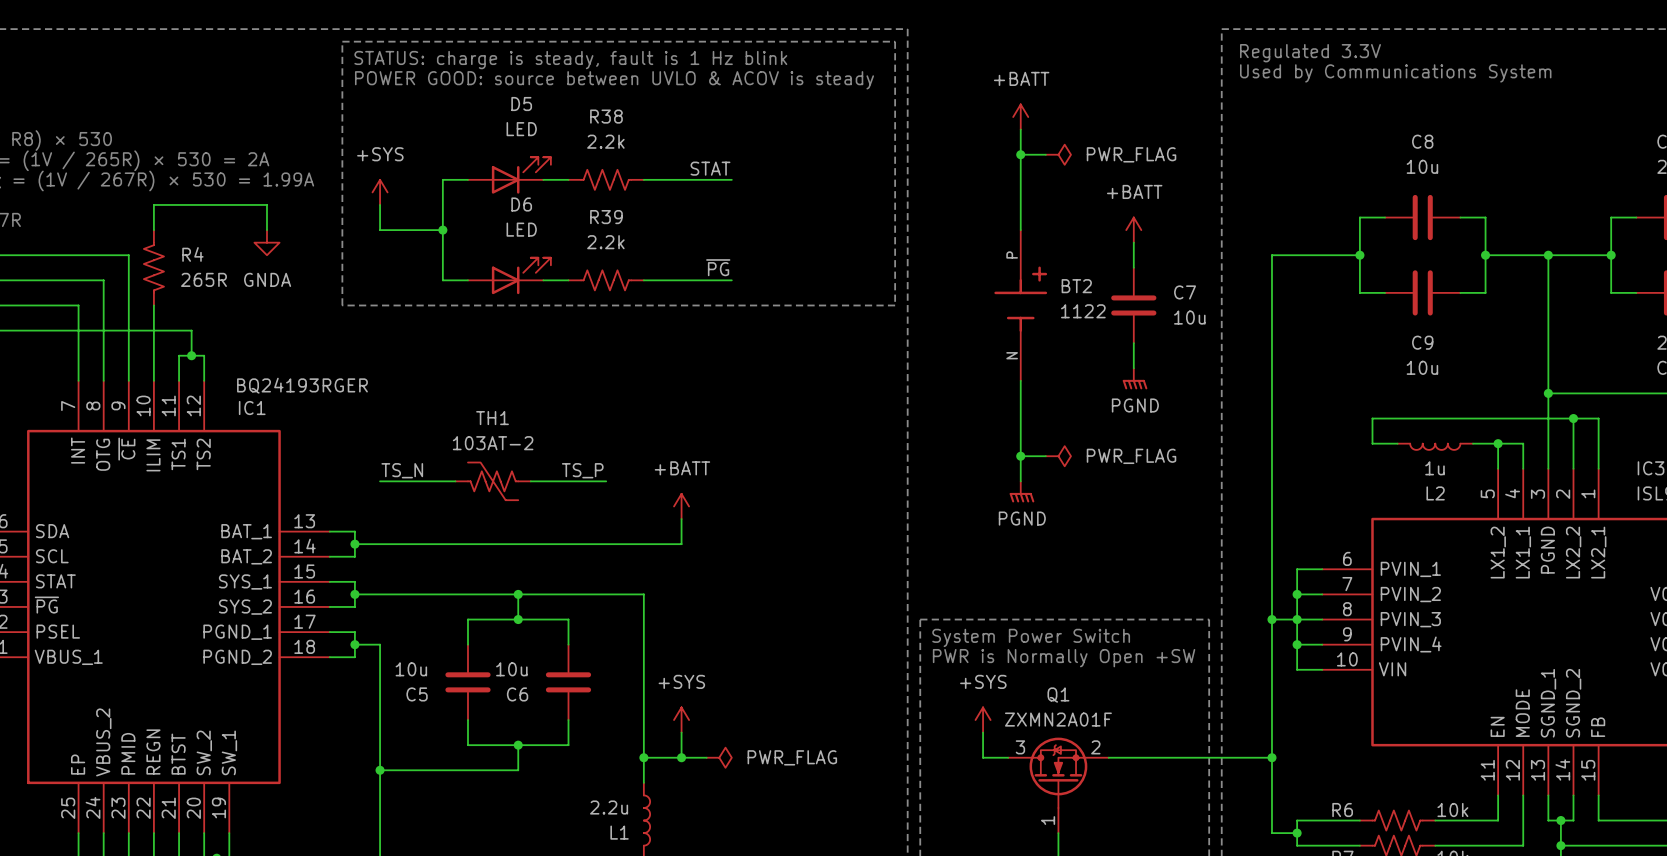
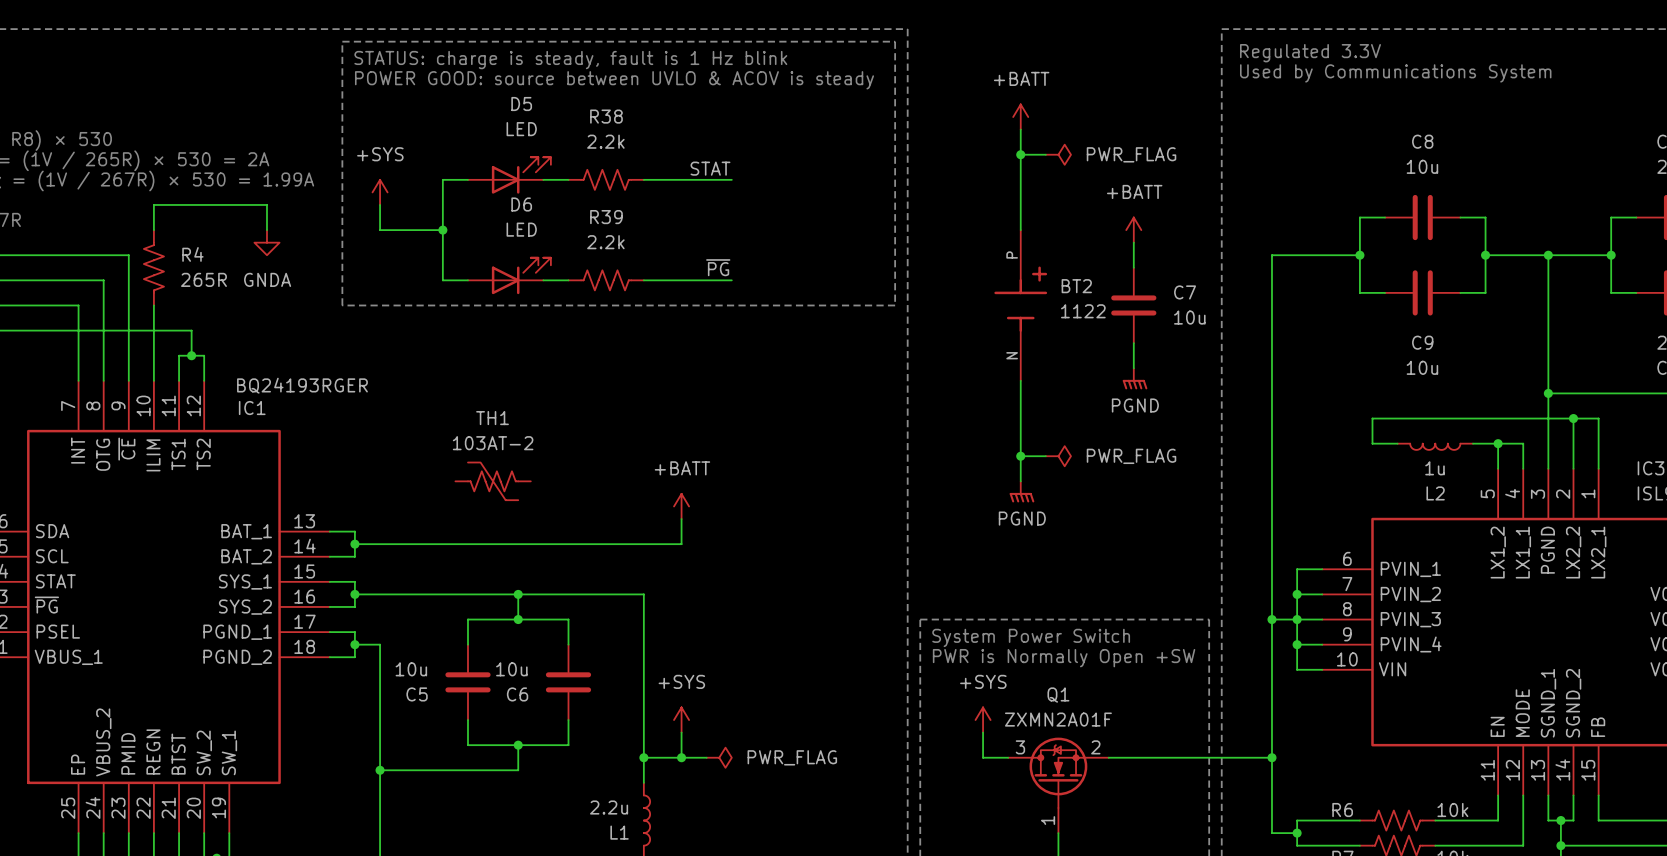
label: TS_N (402, 470) -> none
label: TS_P (582, 470) -> none
wire: (380, 481) (455, 481) -> none
wire: (530, 481) (606, 481) -> none

